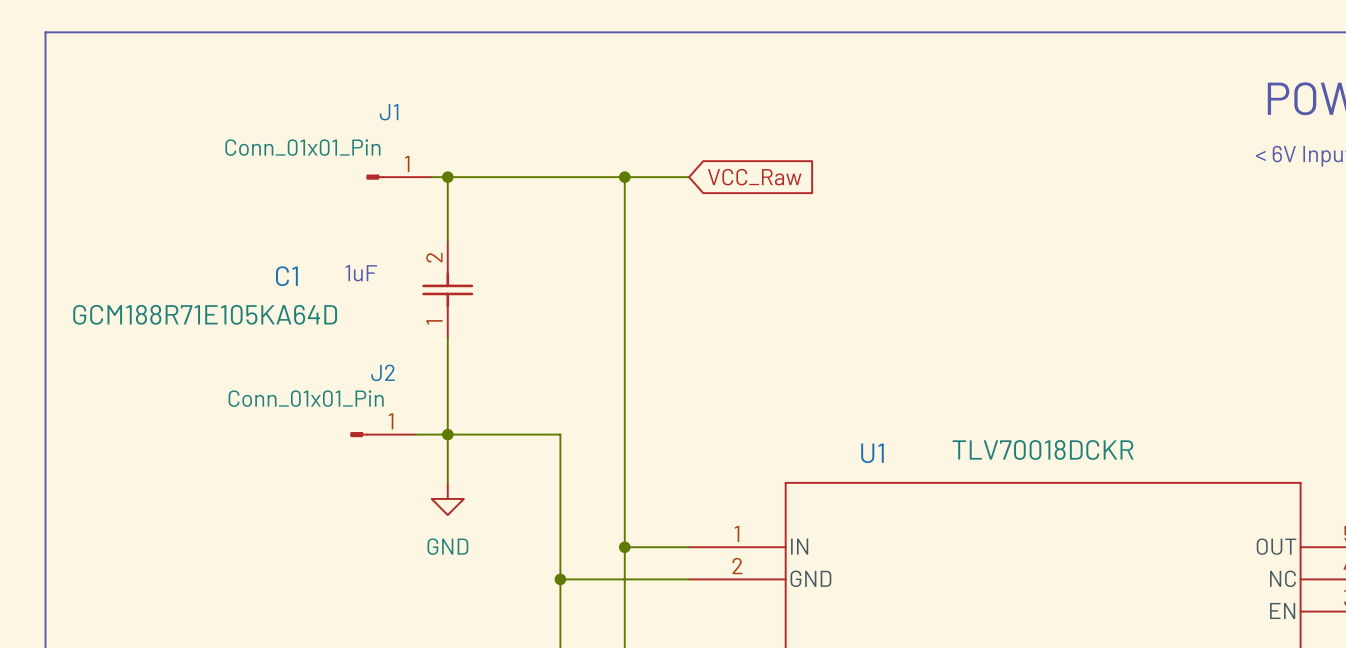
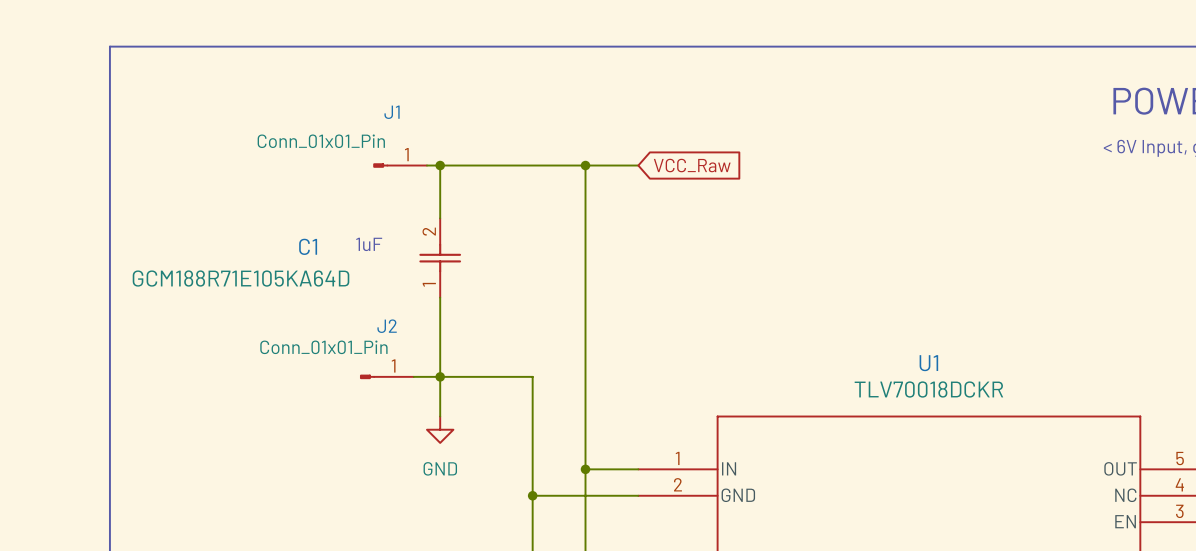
U1 name position: U1 (872, 453) -> U1 (928, 363)

